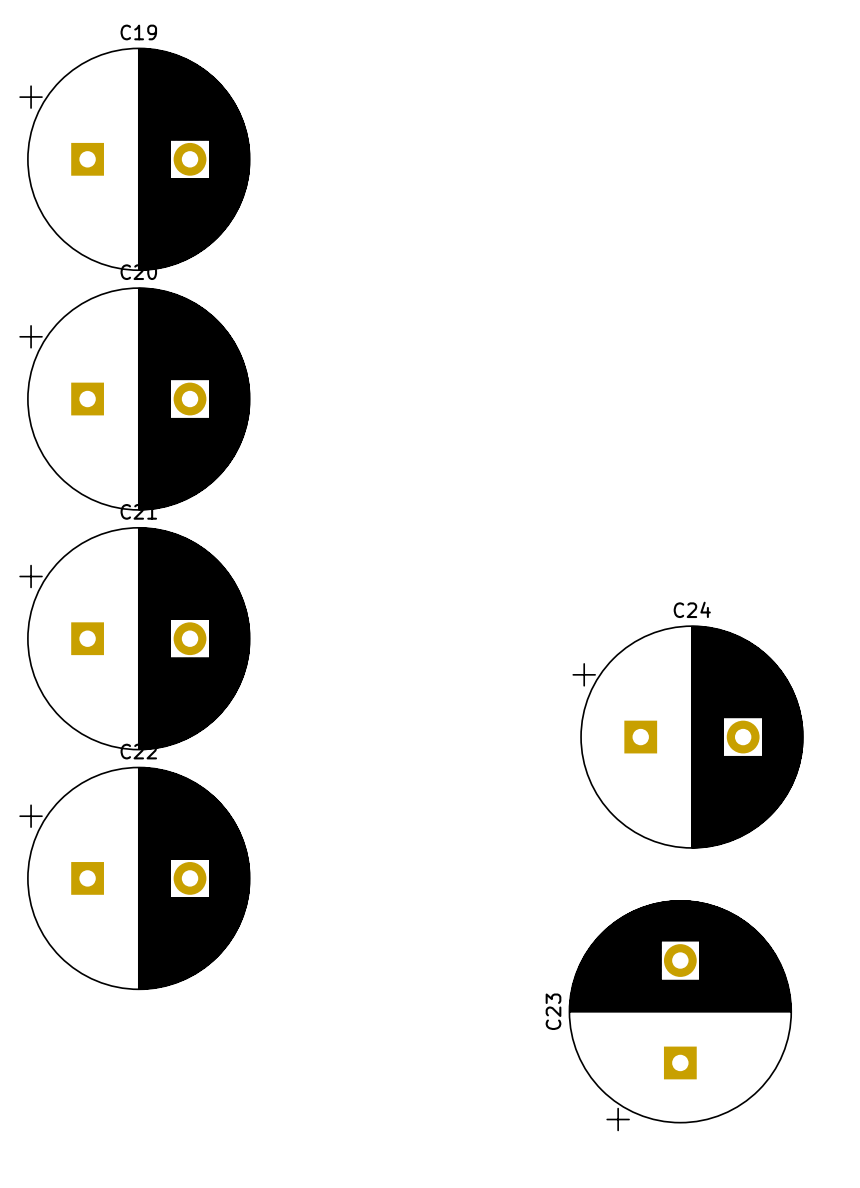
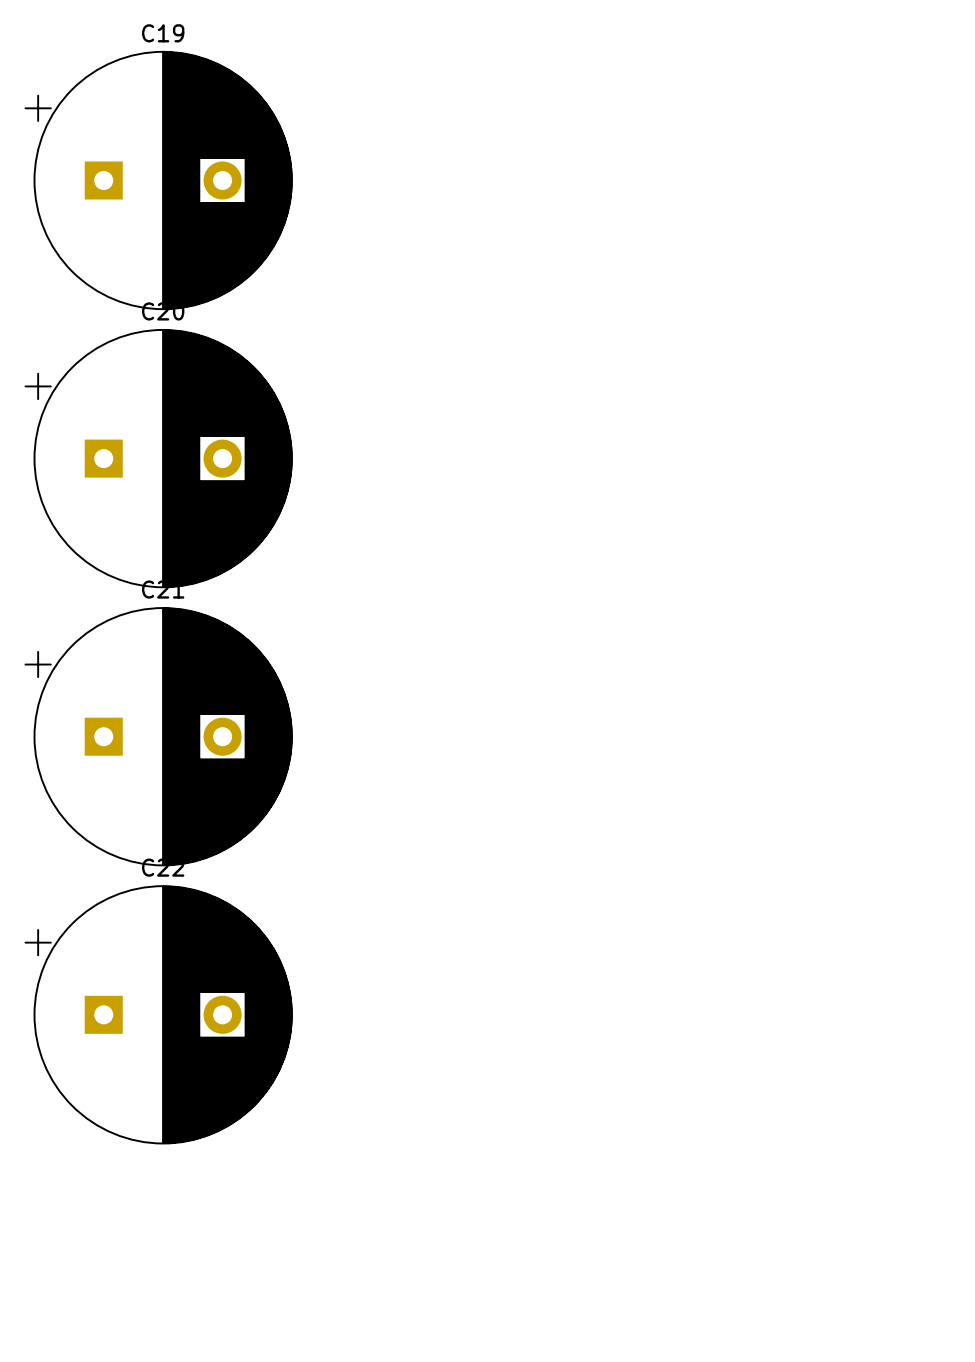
C24: (688, 737) -> none
C23: (680, 1015) -> none

